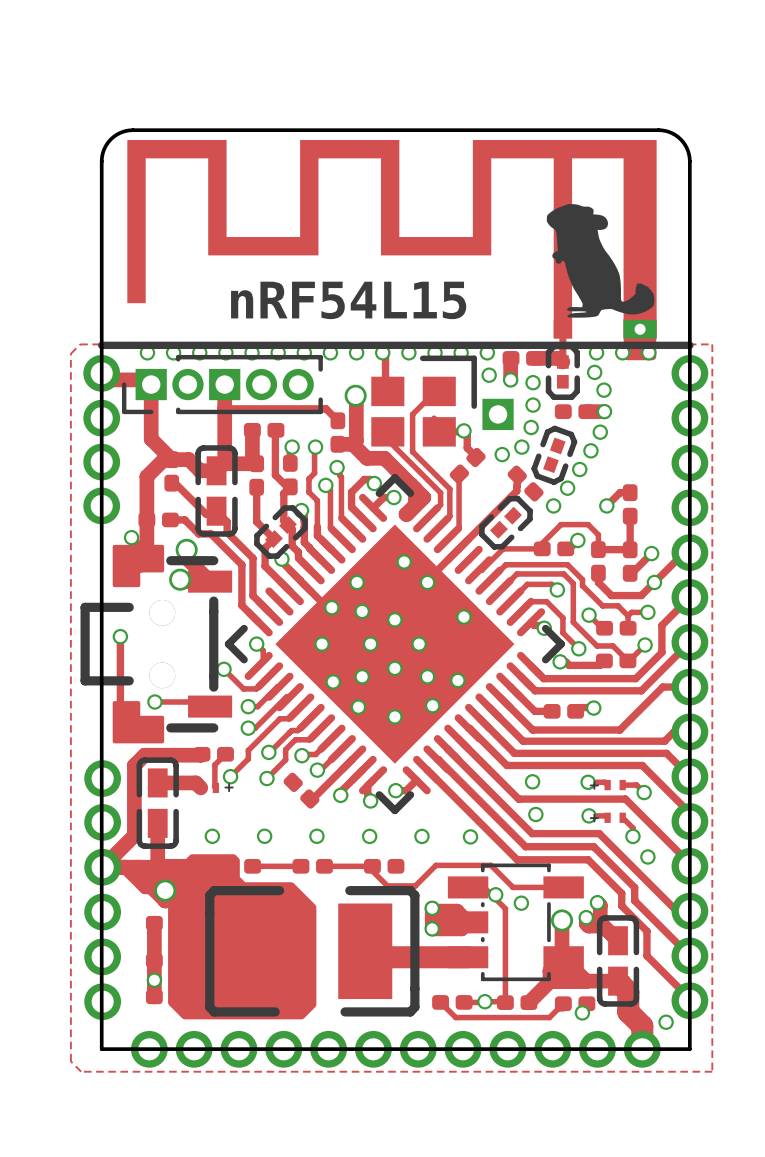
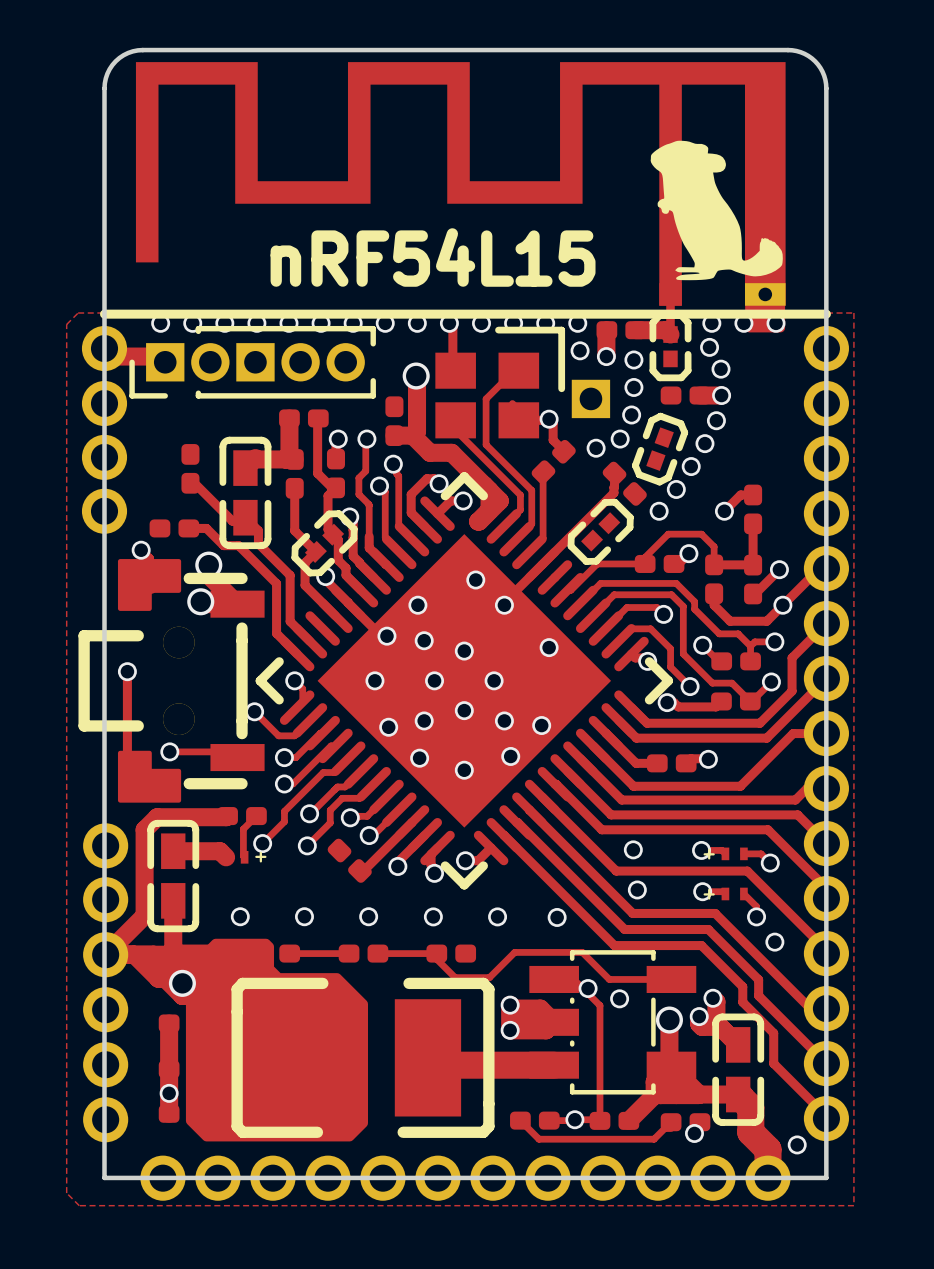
track: (151, 384) (151, 439) (171, 459) -> none
track: (224, 384) (224, 462) -> none
track: (224, 408) (325, 408) (337, 420) -> none
track: (216, 470) (200, 470) (188, 459) (163, 459) (146, 476) (146, 557) -> none

